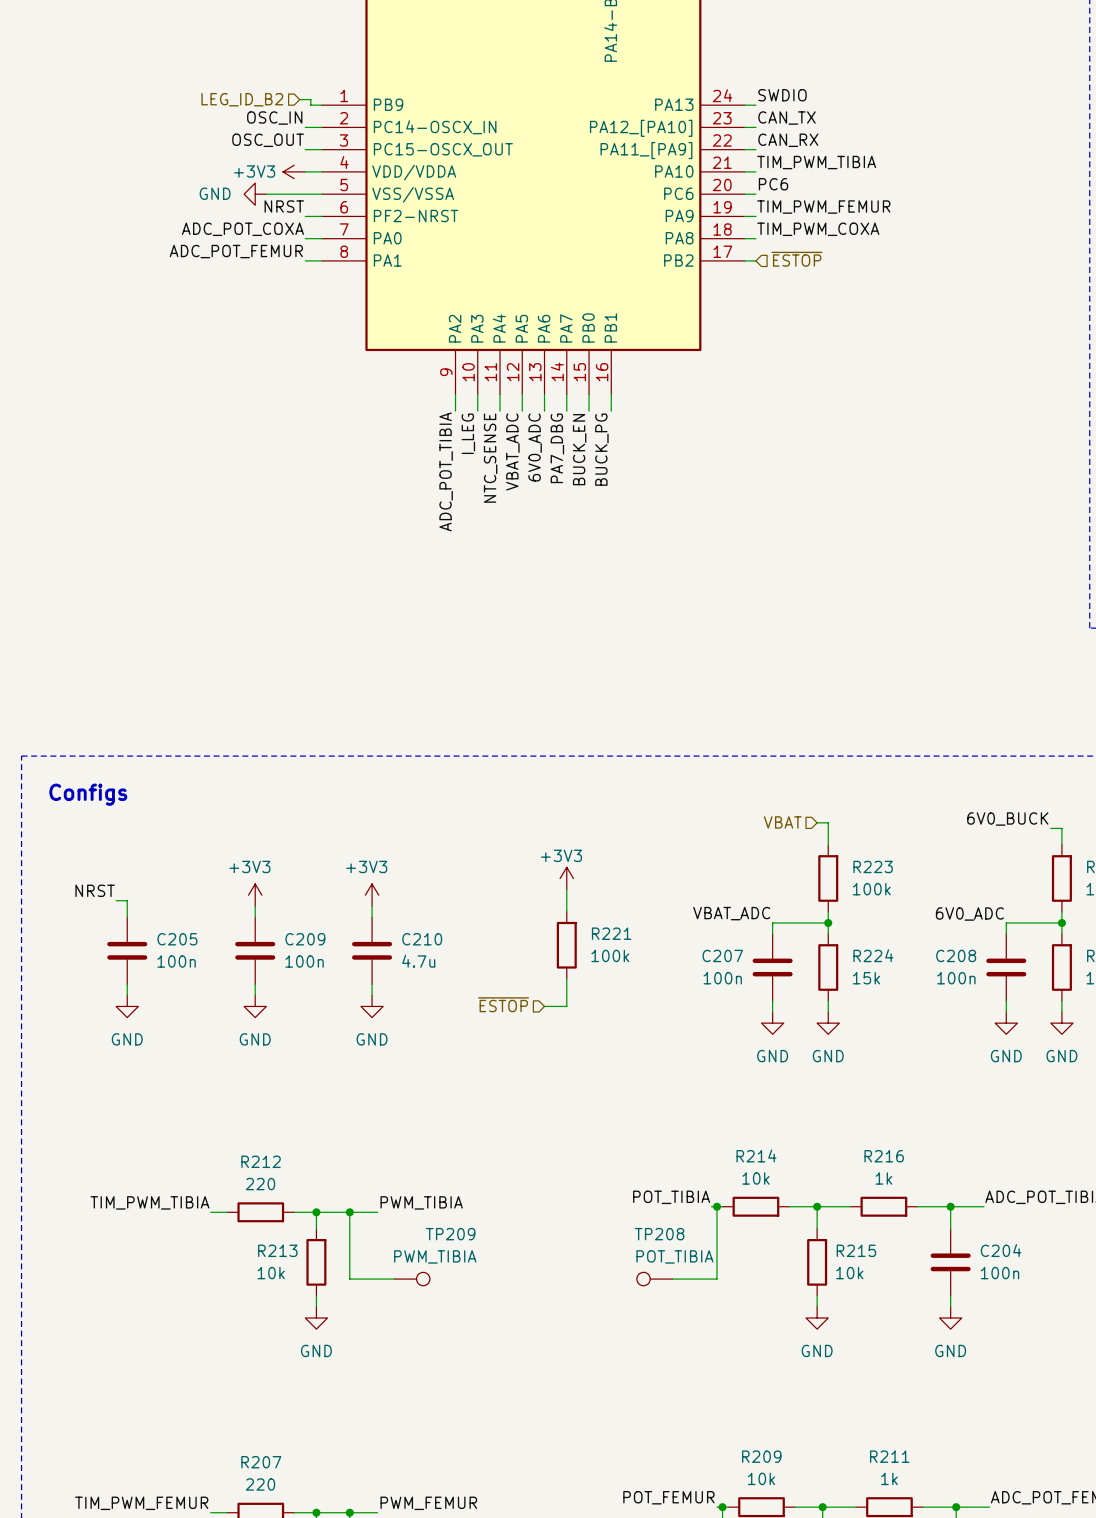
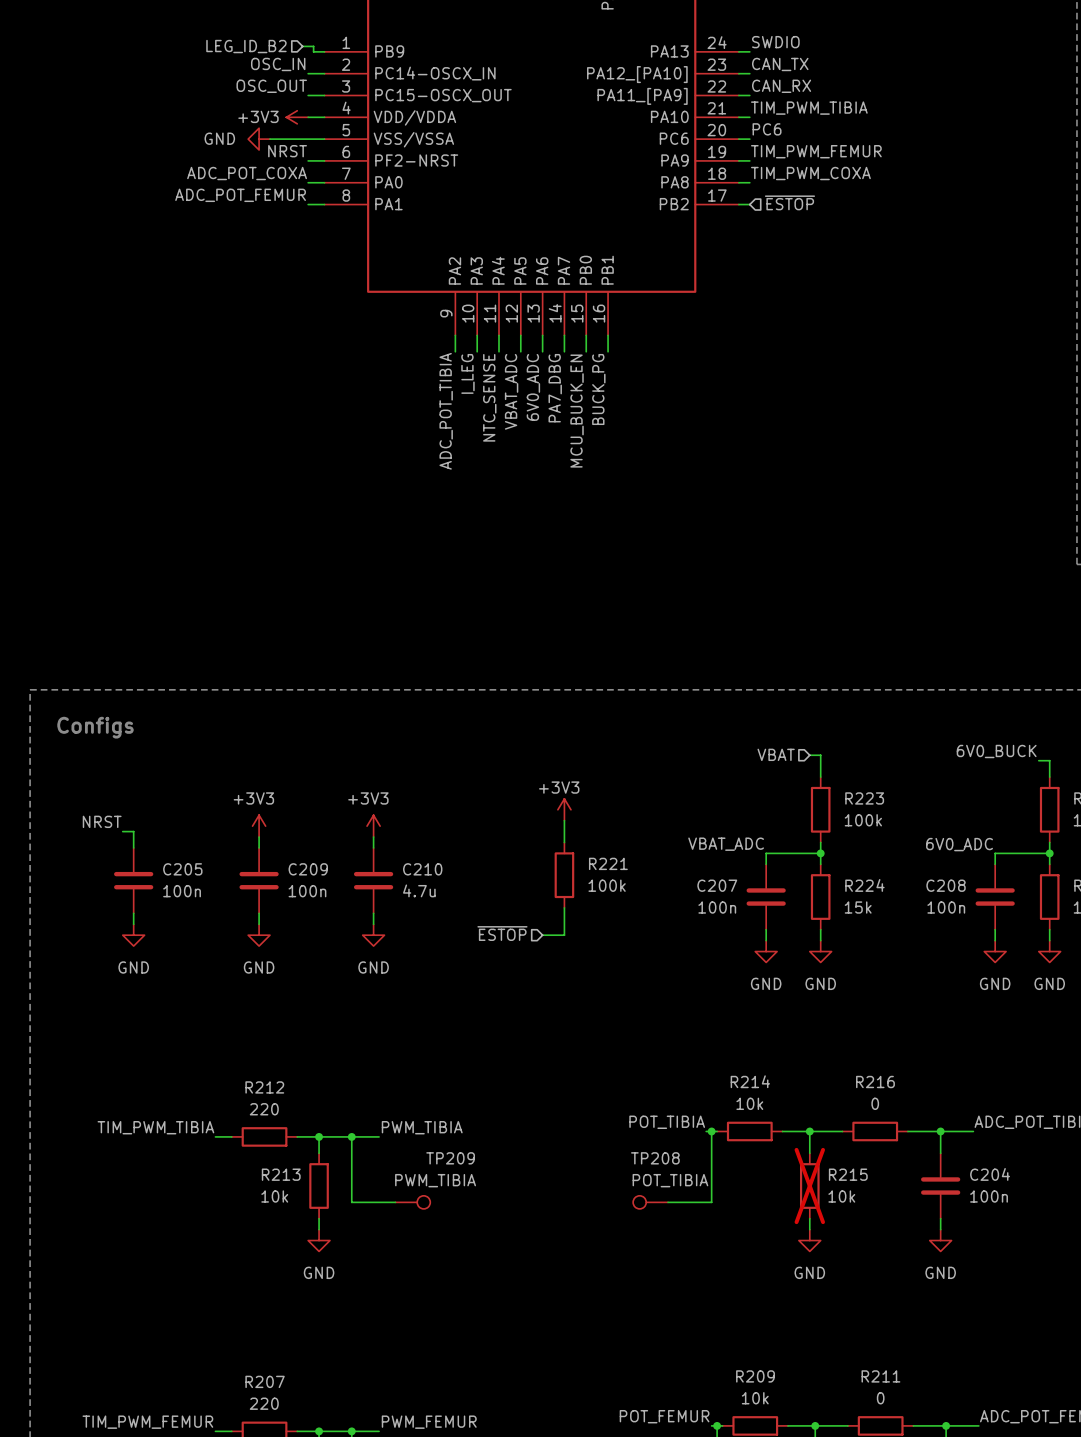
label: BUCK_EN (579, 449) -> MCU_BUCK_EN (577, 411)
R216 value: 1k (883, 1178) -> 0 (875, 1103)
R215 do-not-place cross: none -> (809, 1186)
R211 value: 1k (889, 1478) -> 0 (880, 1398)

